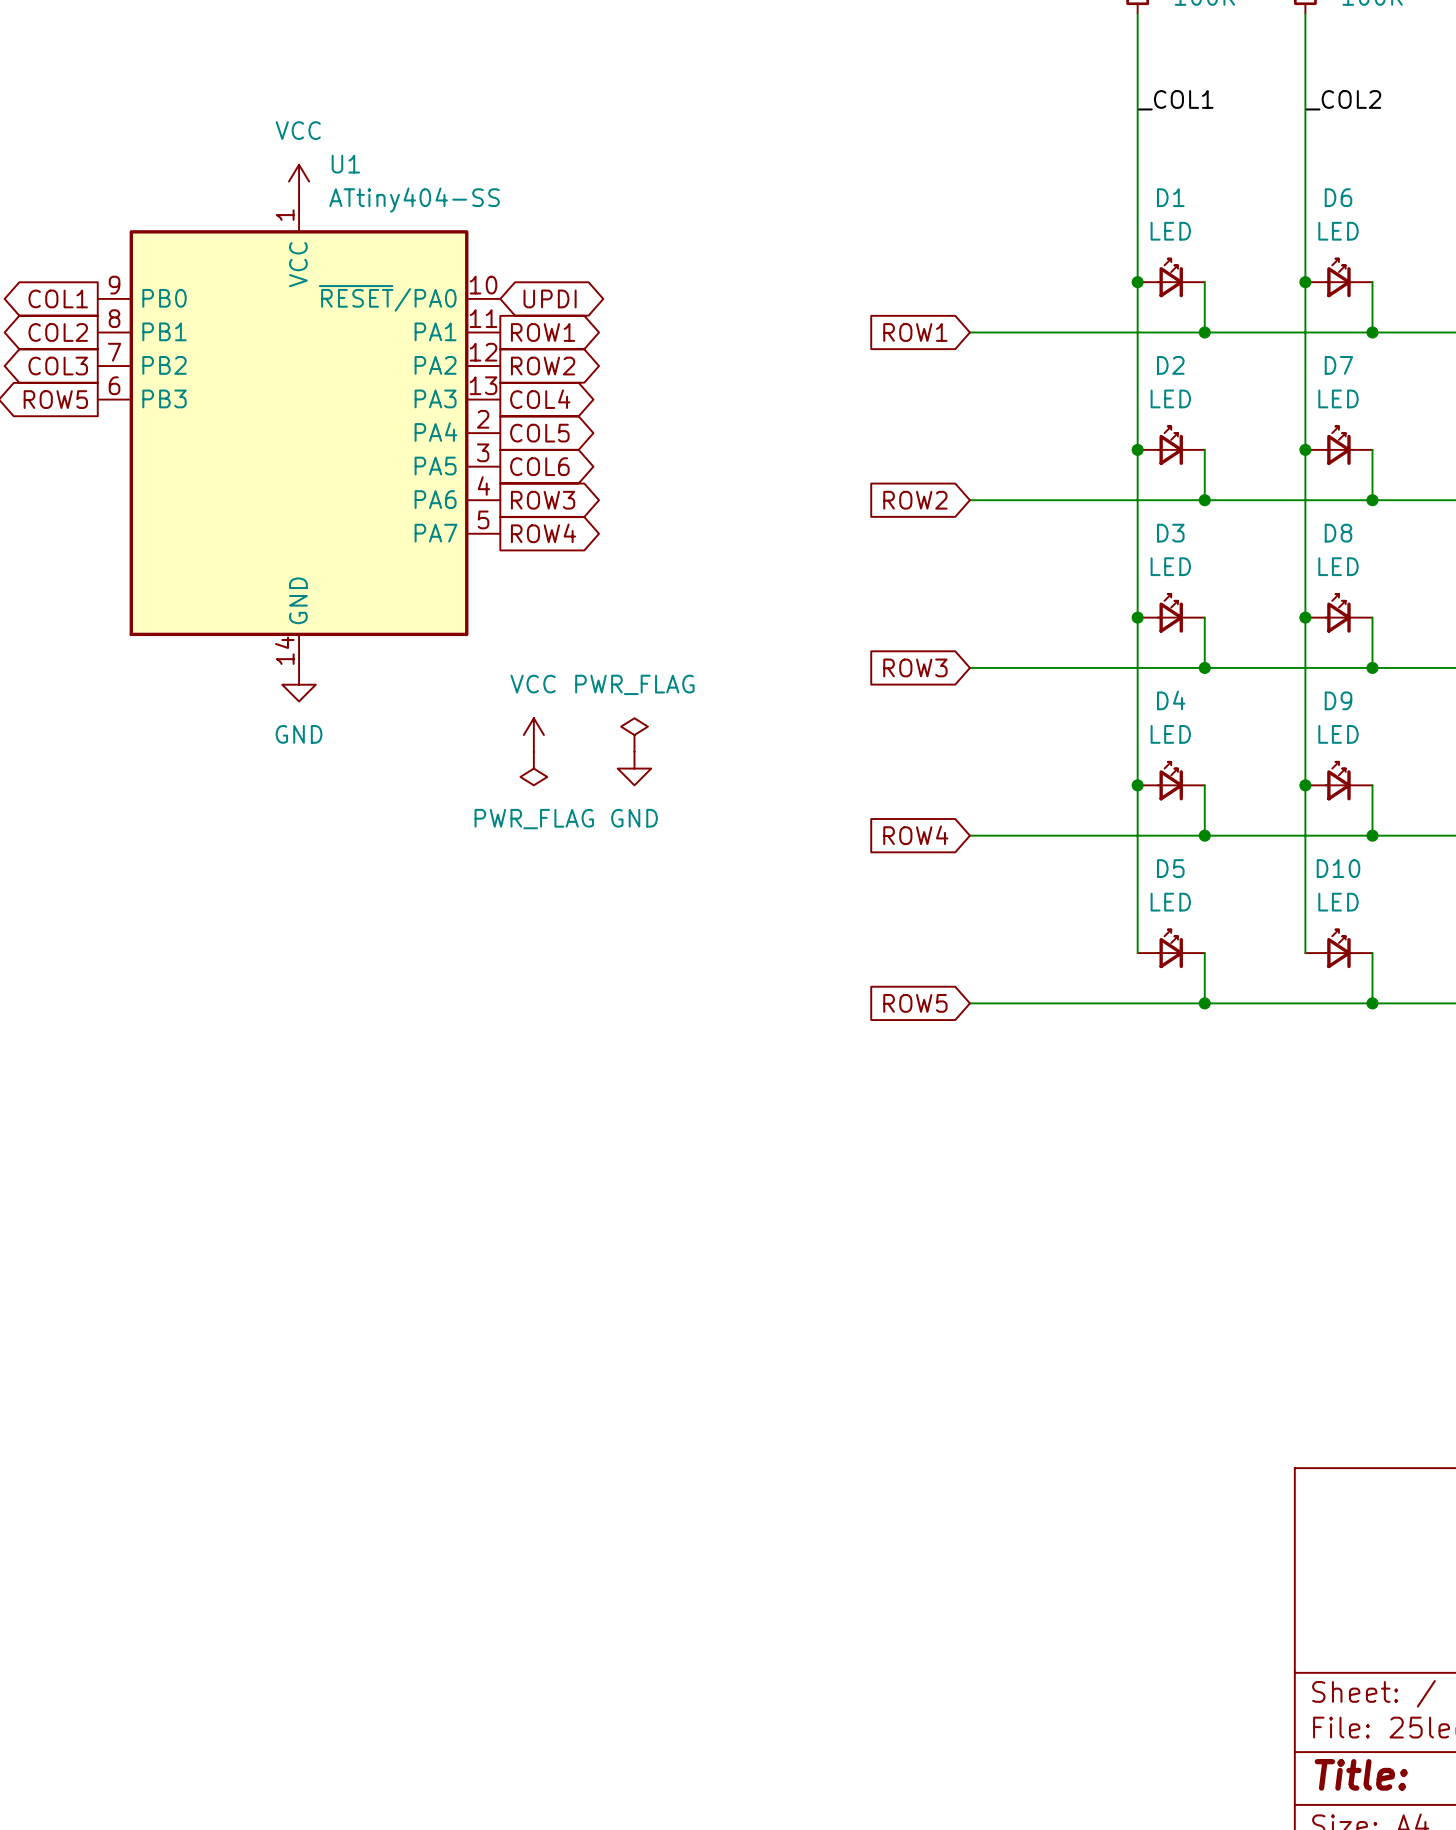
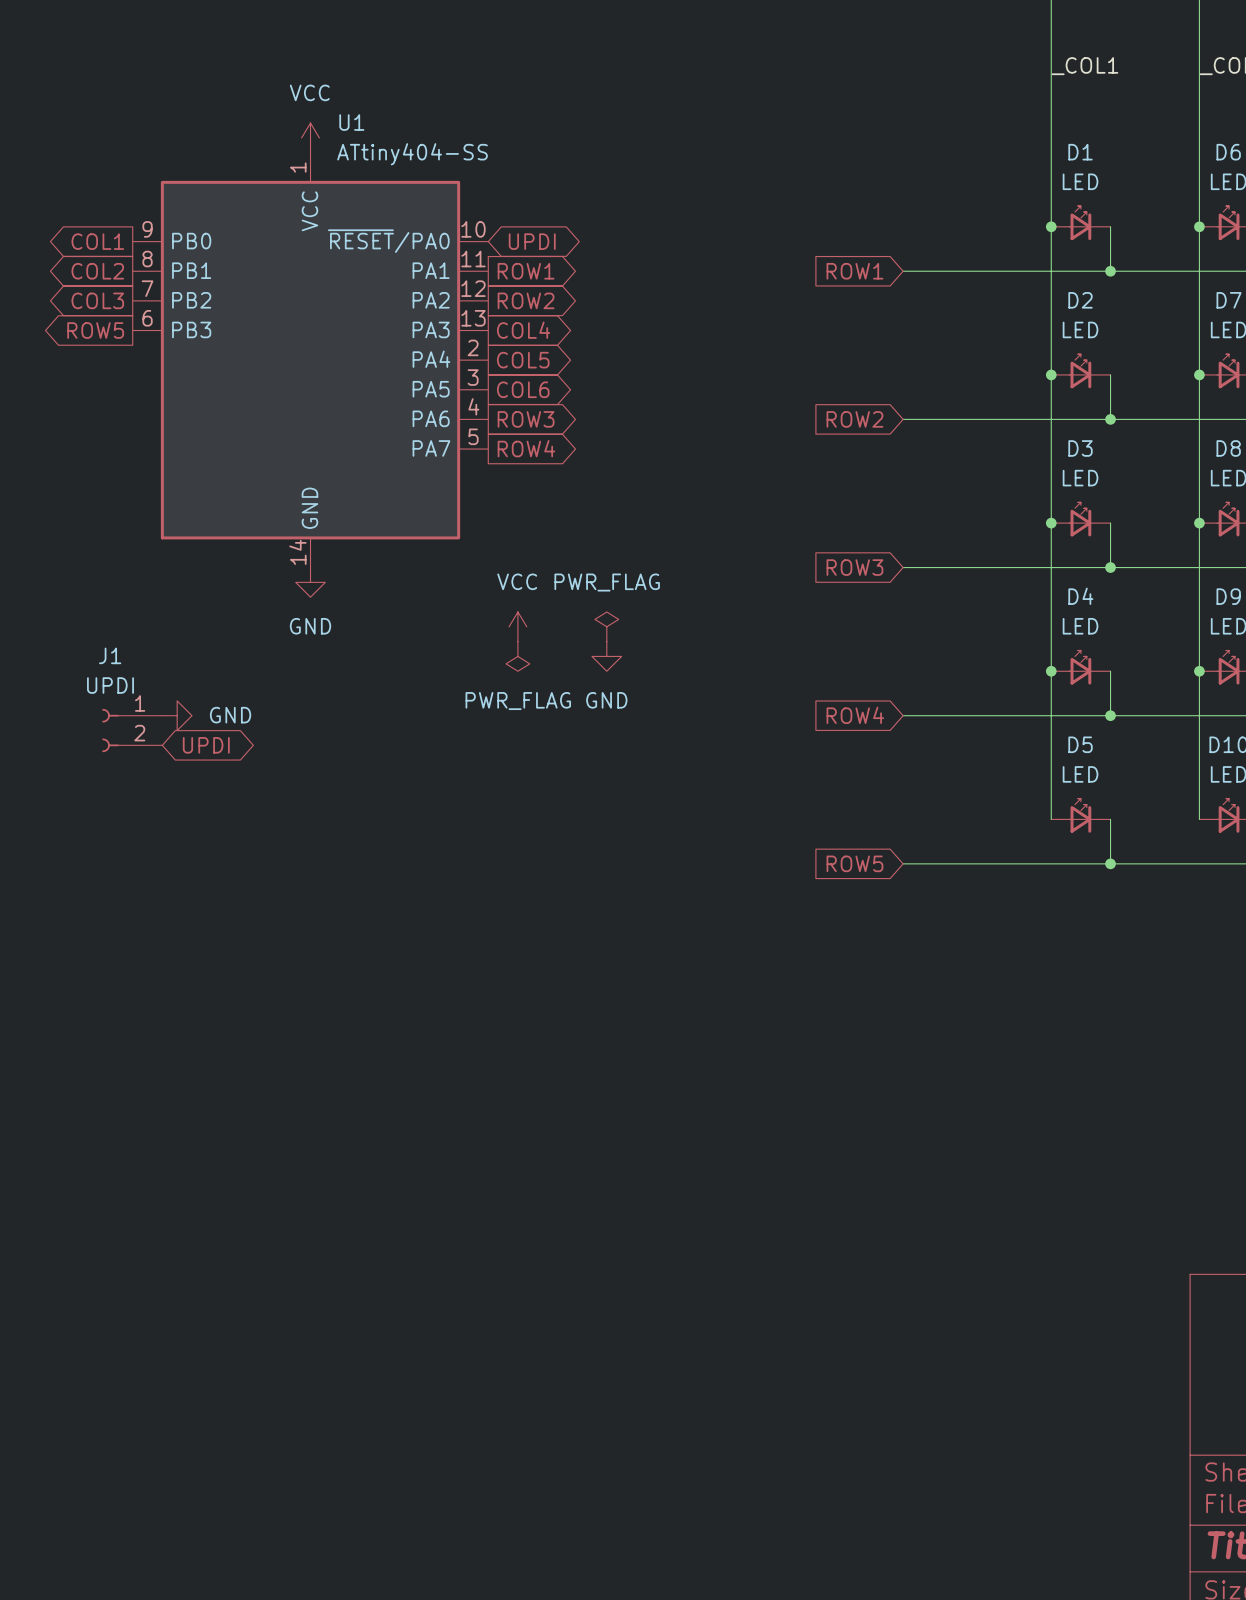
power symbol: none -> GND (177, 715)
J1: none -> UPDI (132, 730)
global label: none -> UPDI (206, 745)

